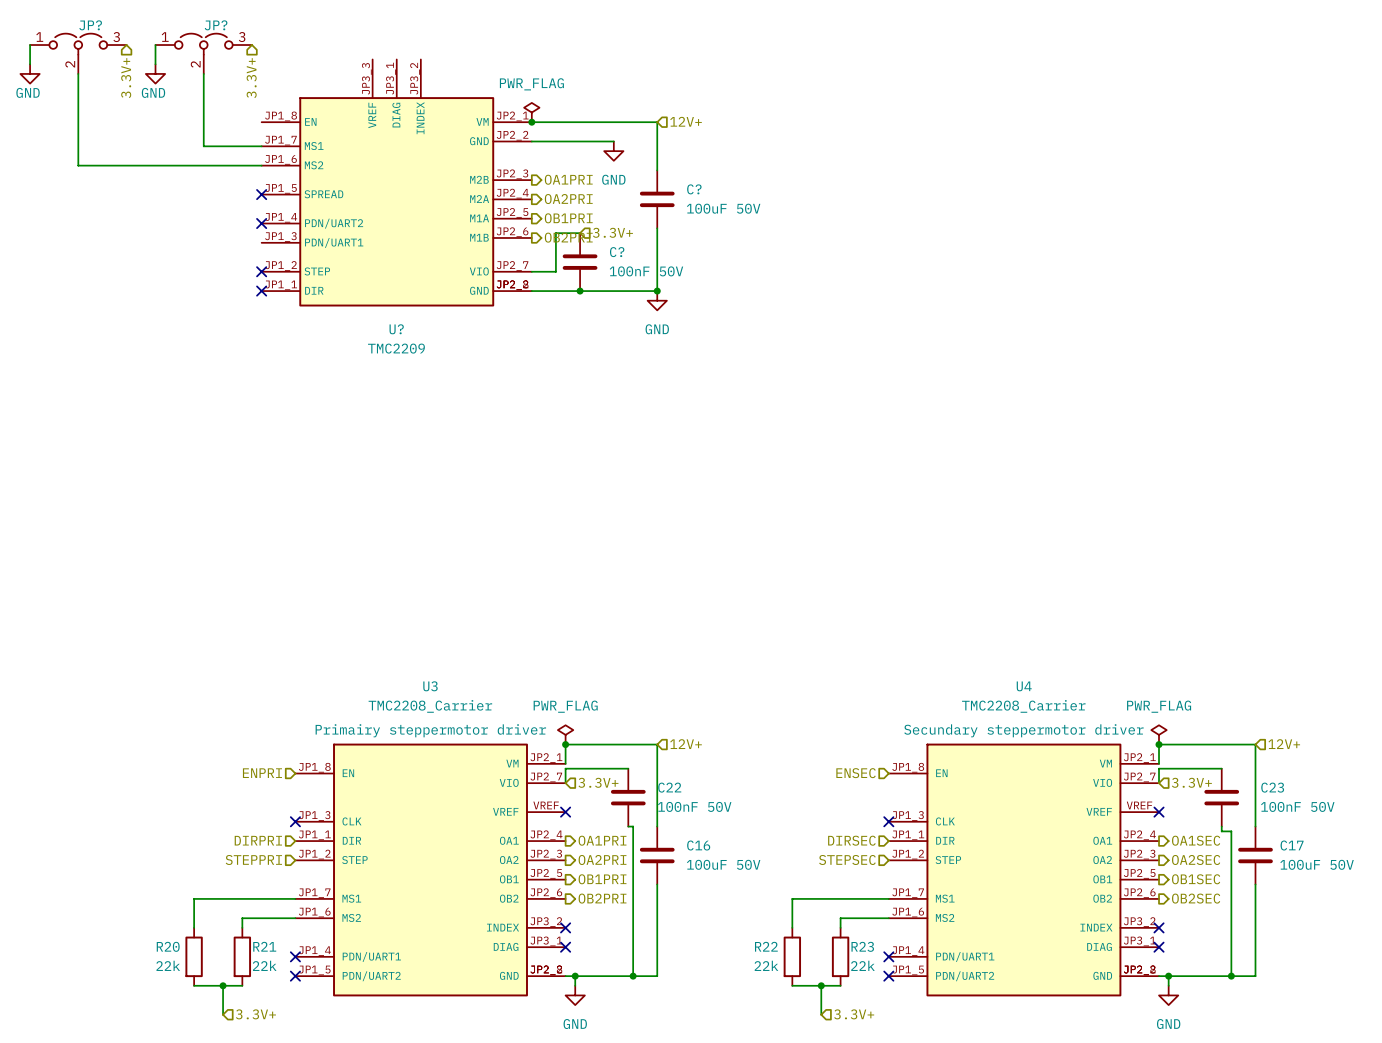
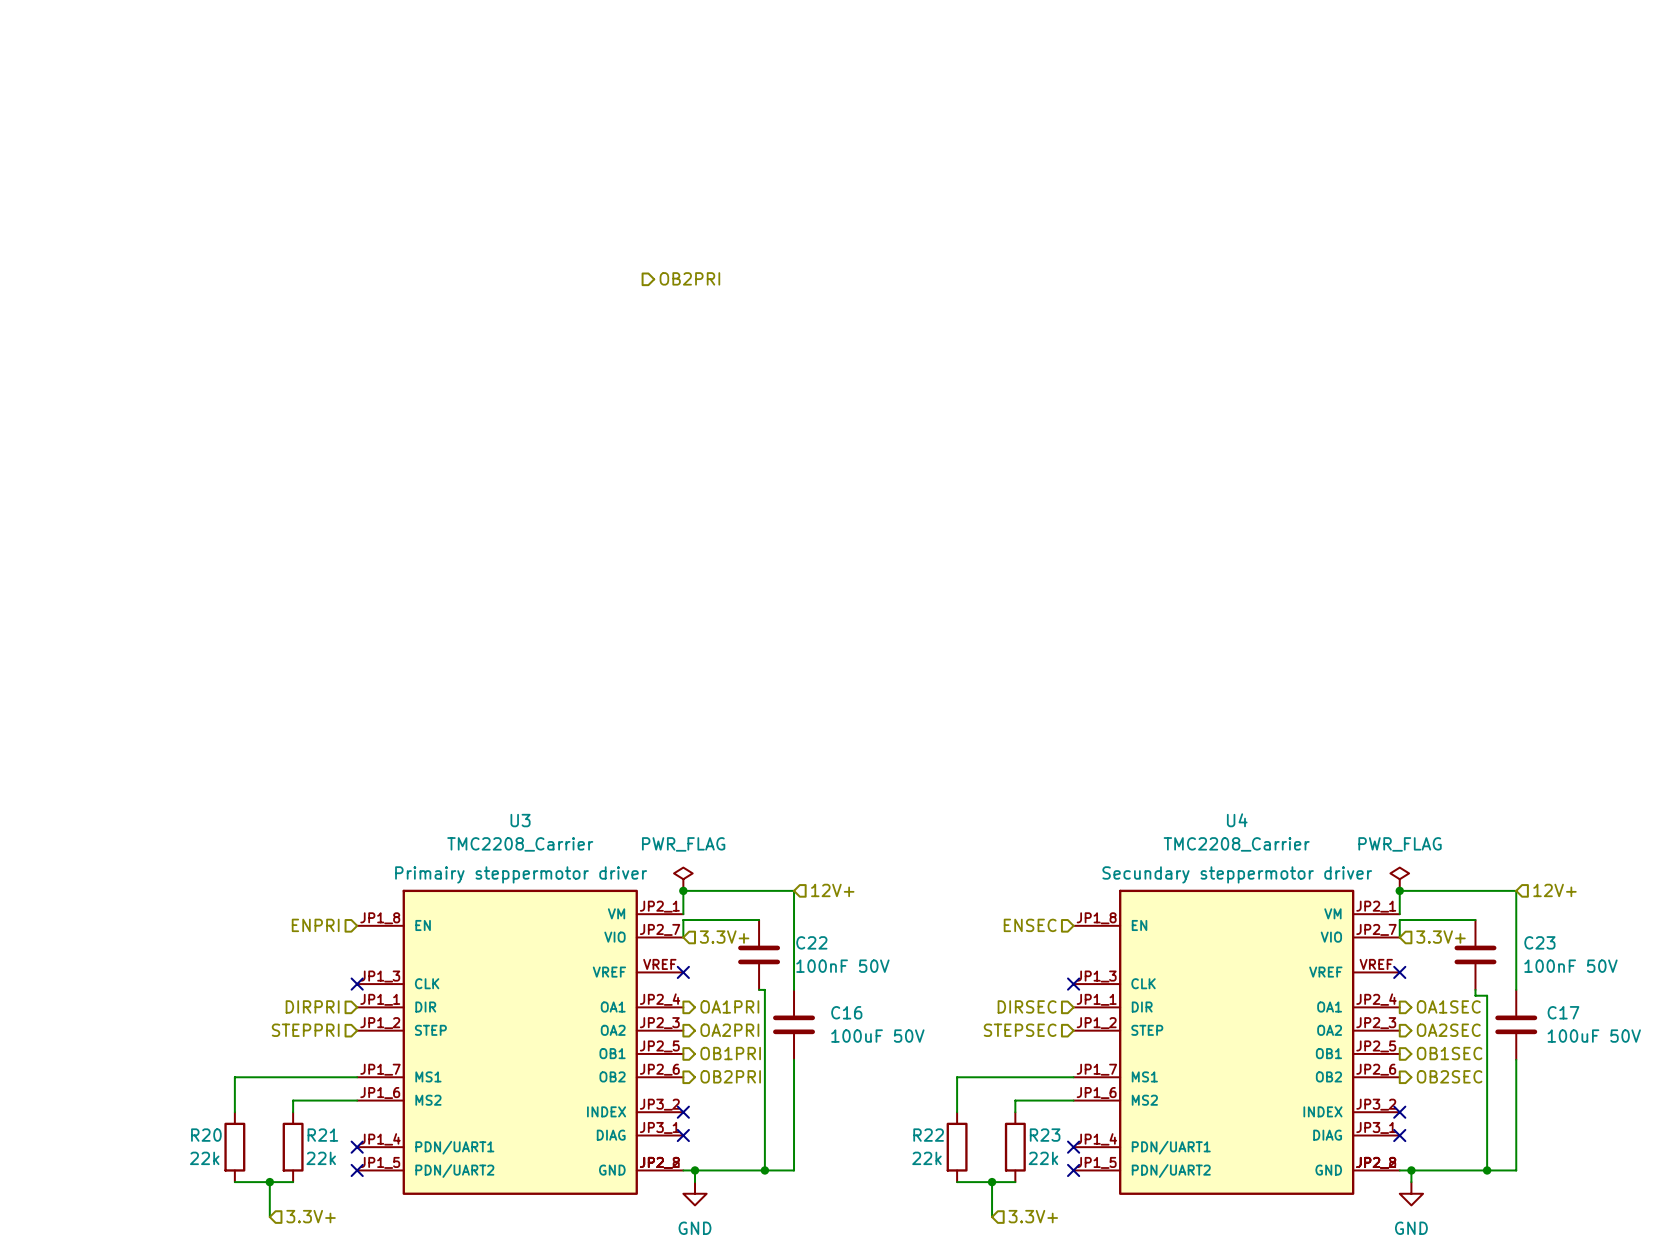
wire: (30, 45) (30, 64) -> none
wire: (155, 45) (155, 64) -> none
JP?: (78, 53) -> none
JP?: (203, 53) -> none
power symbol: GND (30, 73) -> none
wire: (78, 73) (78, 165) (261, 165) -> none
power symbol: GND (155, 73) -> none
wire: (203, 73) (203, 146) (261, 146) -> none
hierarchical label: 3.3V+ (126, 78) -> none
hierarchical label: 3.3V+ (251, 78) -> none
power symbol: PWR_FLAG (531, 112) -> none
hierarchical label: 12V+ (686, 121) -> none
wire: (531, 122) (657, 122) (657, 170) -> none
junction: (531, 122) -> none
wire: (531, 141) (613, 141) -> none
power symbol: GND (613, 151) -> none
hierarchical label: OA1PRI (568, 179) -> none
U?: TMC2209 (396, 182) -> none
no-connect mark: (261, 194) -> none
hierarchical label: OA2PRI (568, 199) -> none
C?: 100uF 50V (657, 199) -> none
hierarchical label: OB1PRI (568, 218) -> none
no-connect mark: (261, 223) -> none
wire: (657, 228) (657, 291) (531, 291) -> none
hierarchical label: 3.3V+ (612, 232) -> none
wire: (580, 233) (555, 233) (555, 271) (531, 271) -> none
C?: 100nF 50V (580, 262) -> none
no-connect mark: (261, 271) -> none
no-connect mark: (261, 291) -> none
junction: (580, 291) -> none
junction: (657, 291) -> none
power symbol: GND (657, 300) -> none

